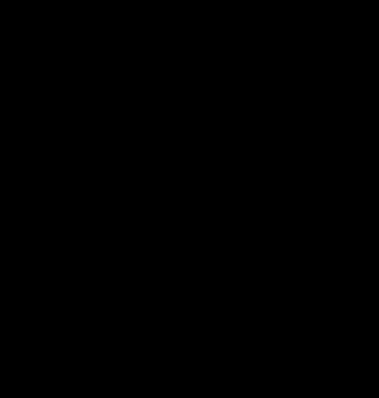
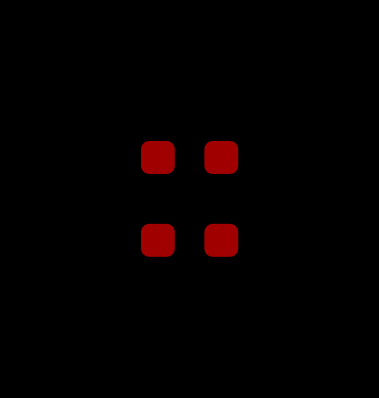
part: none -> (189, 157)
part: none -> (189, 240)

